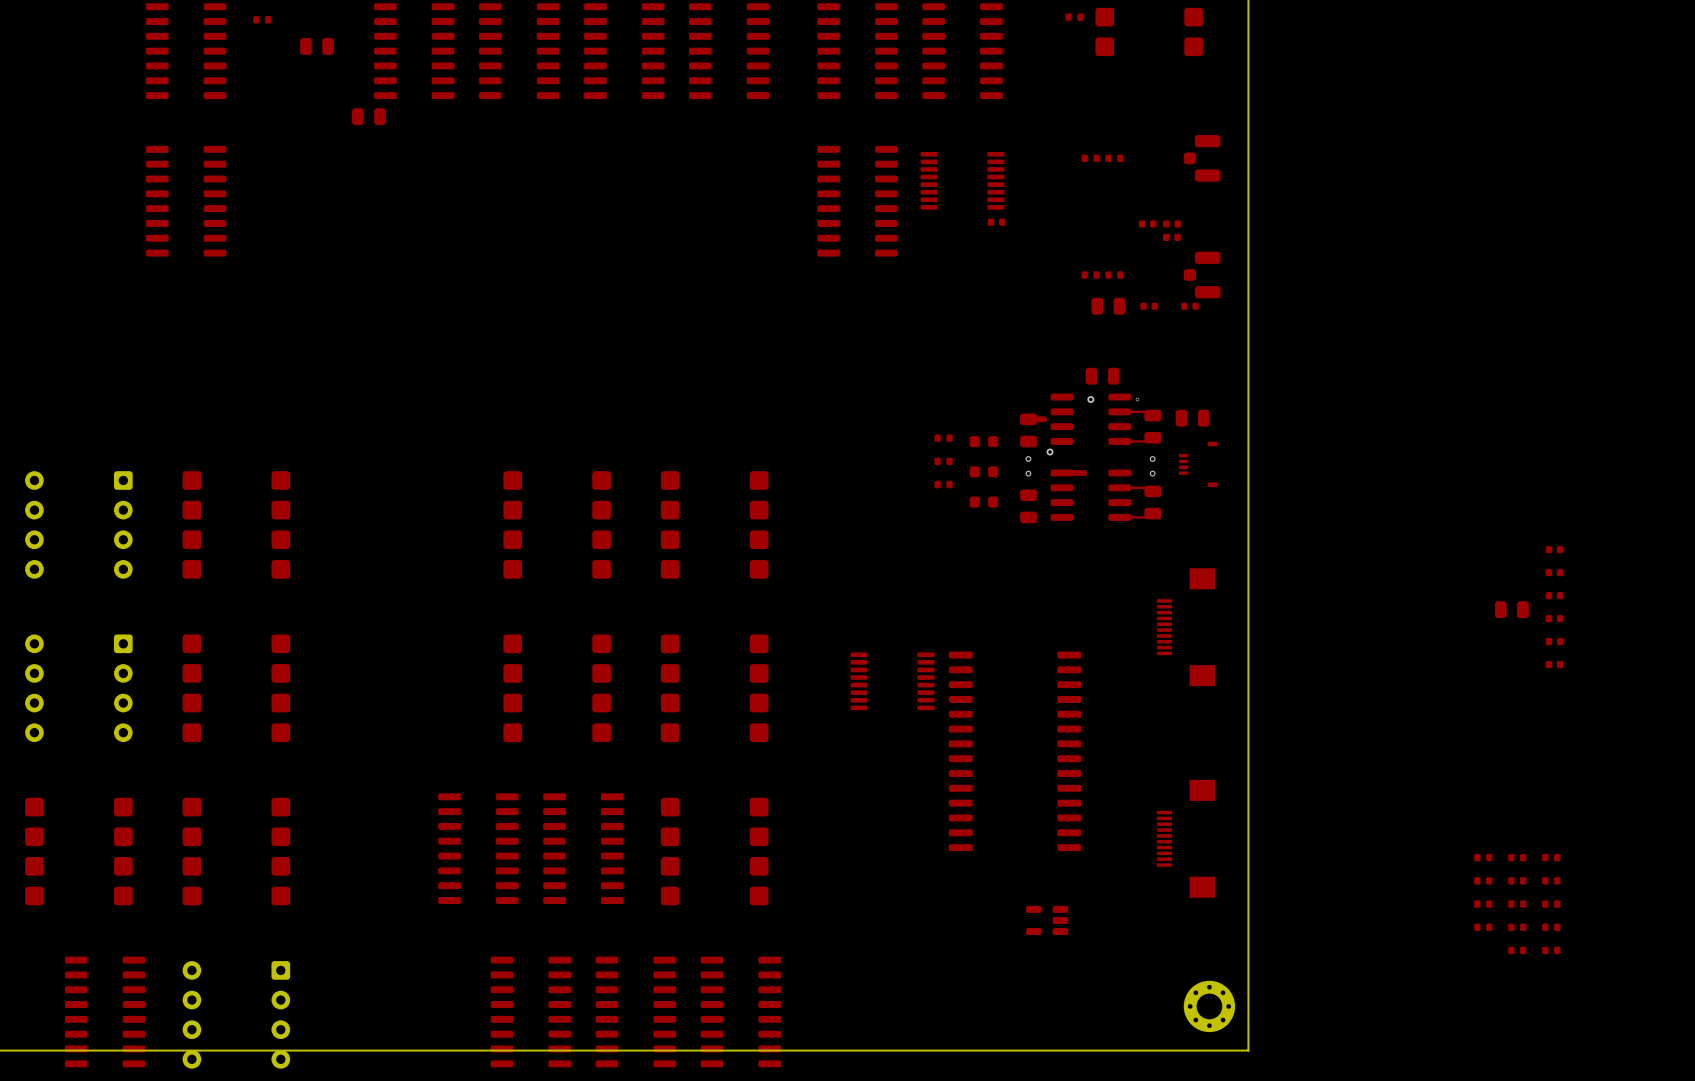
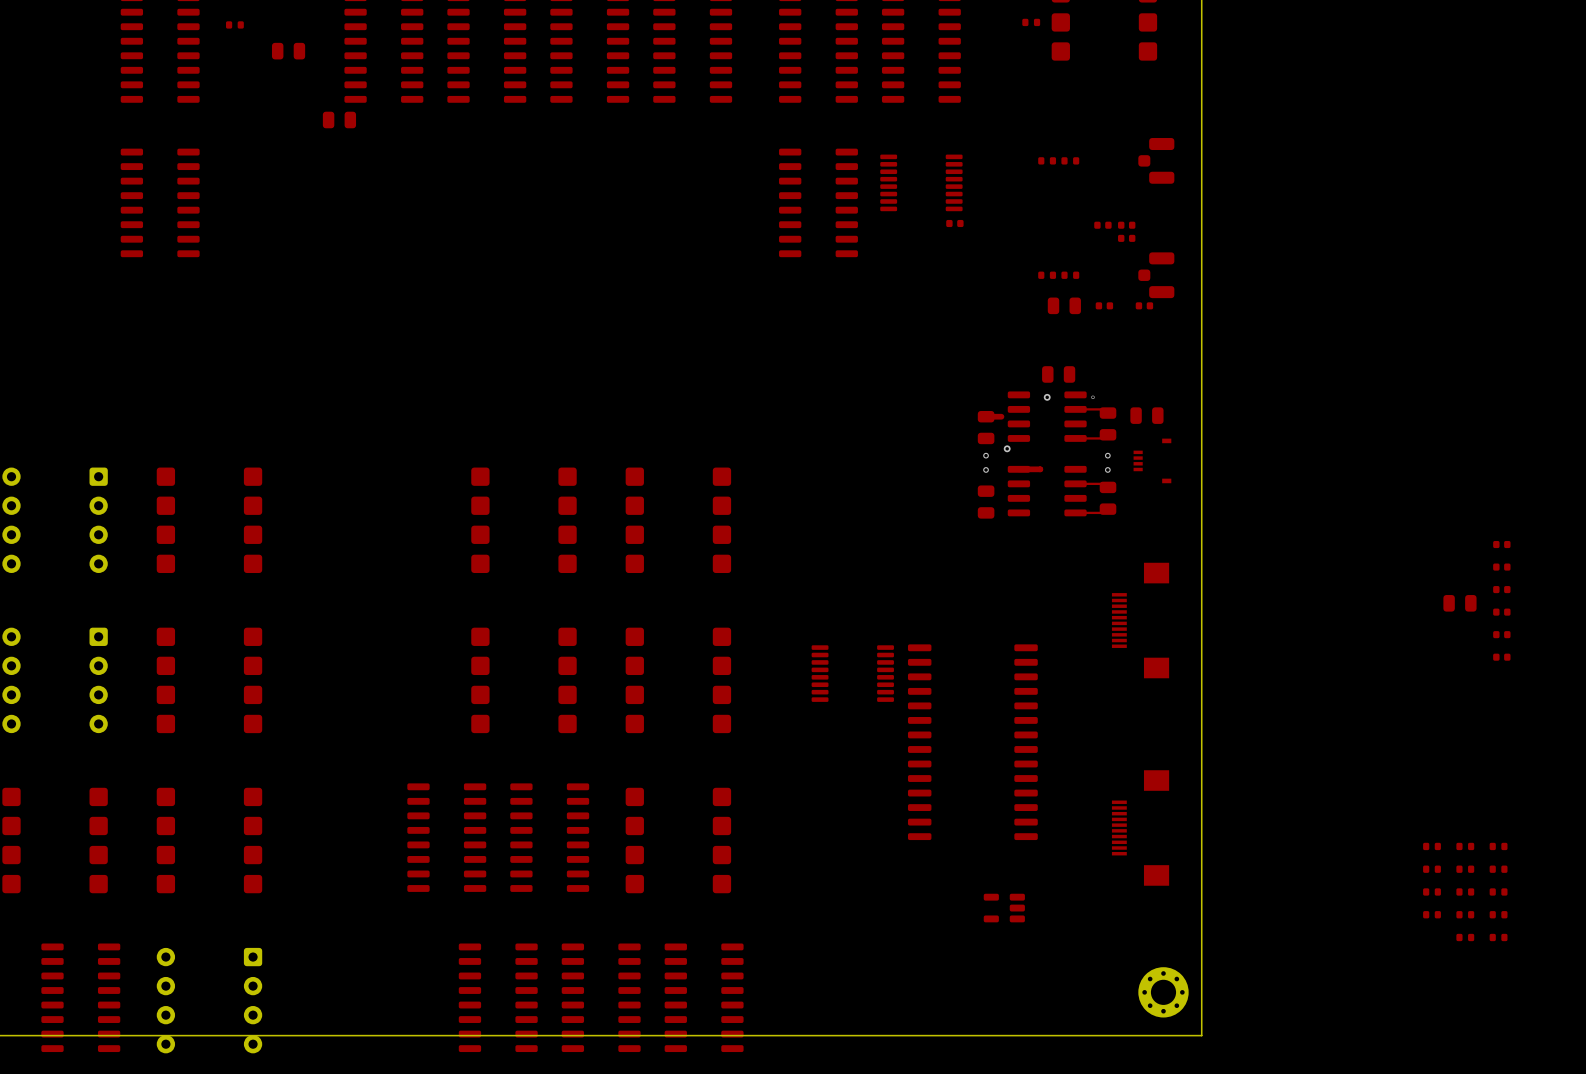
part: (943, 438) -> none
part: (983, 441) -> none
part: (943, 461) -> none
part: (983, 471) -> none
part: (943, 484) -> none
part: (983, 502) -> none

